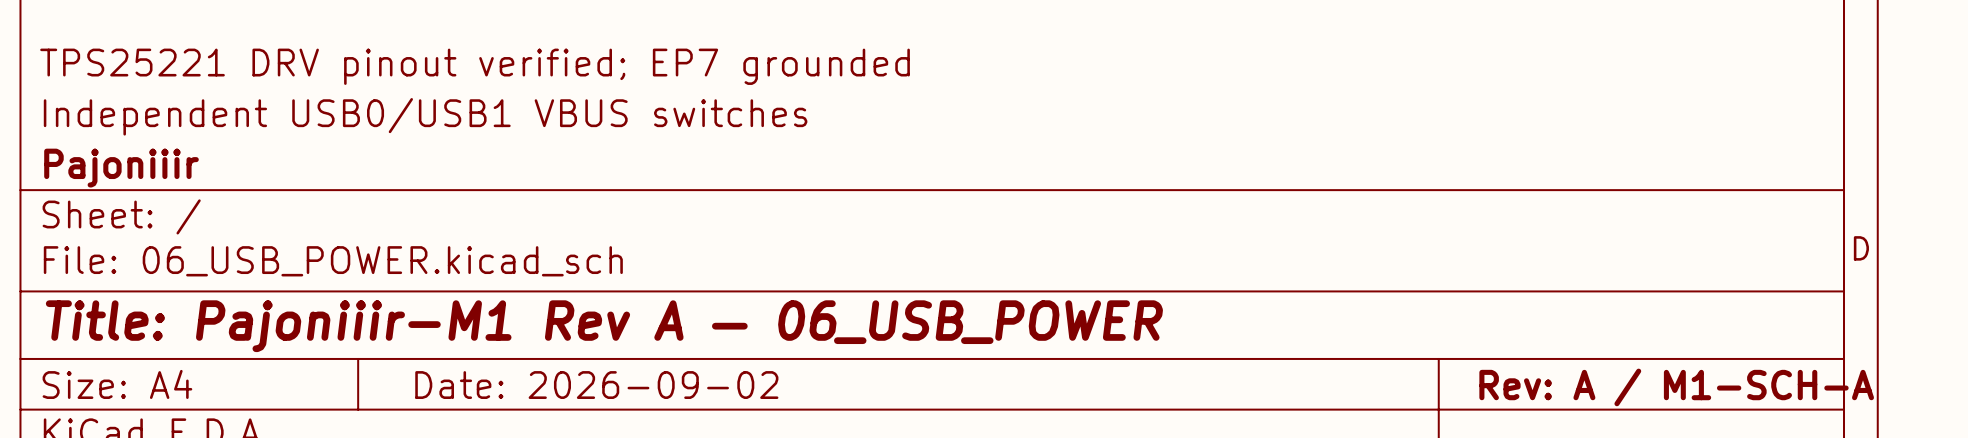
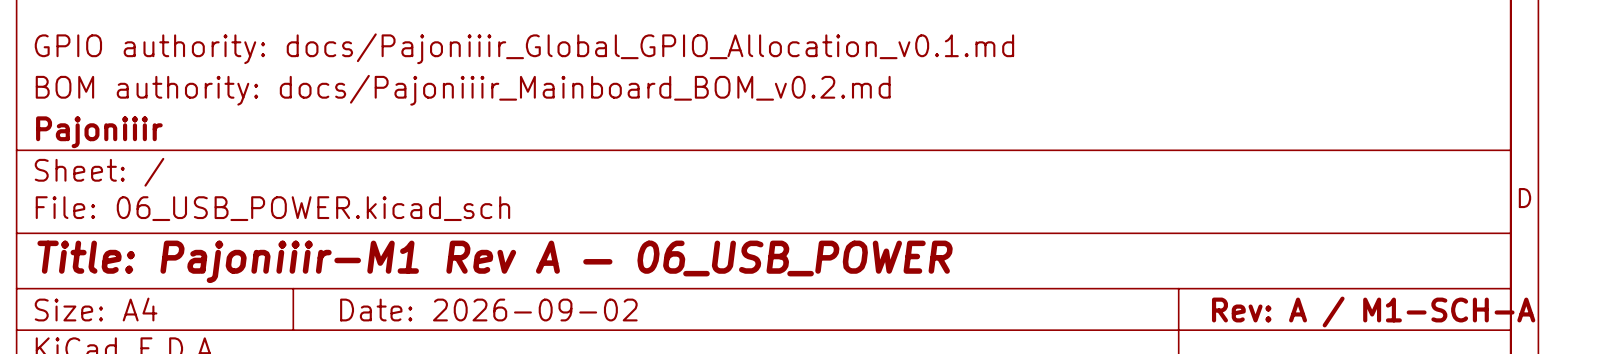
title block: TPS25221 DRV pinout verified; EP7 grounded (475, 66) -> GPIO authority: docs/Pajoniiir_Global_GPIO_Allocation_v0.1.md (524, 48)
title block: Independent USB0/USB1 VBUS switches (425, 116) -> BOM authority: docs/Pajoniiir_Mainboard_BOM_v0.2.md (463, 90)

